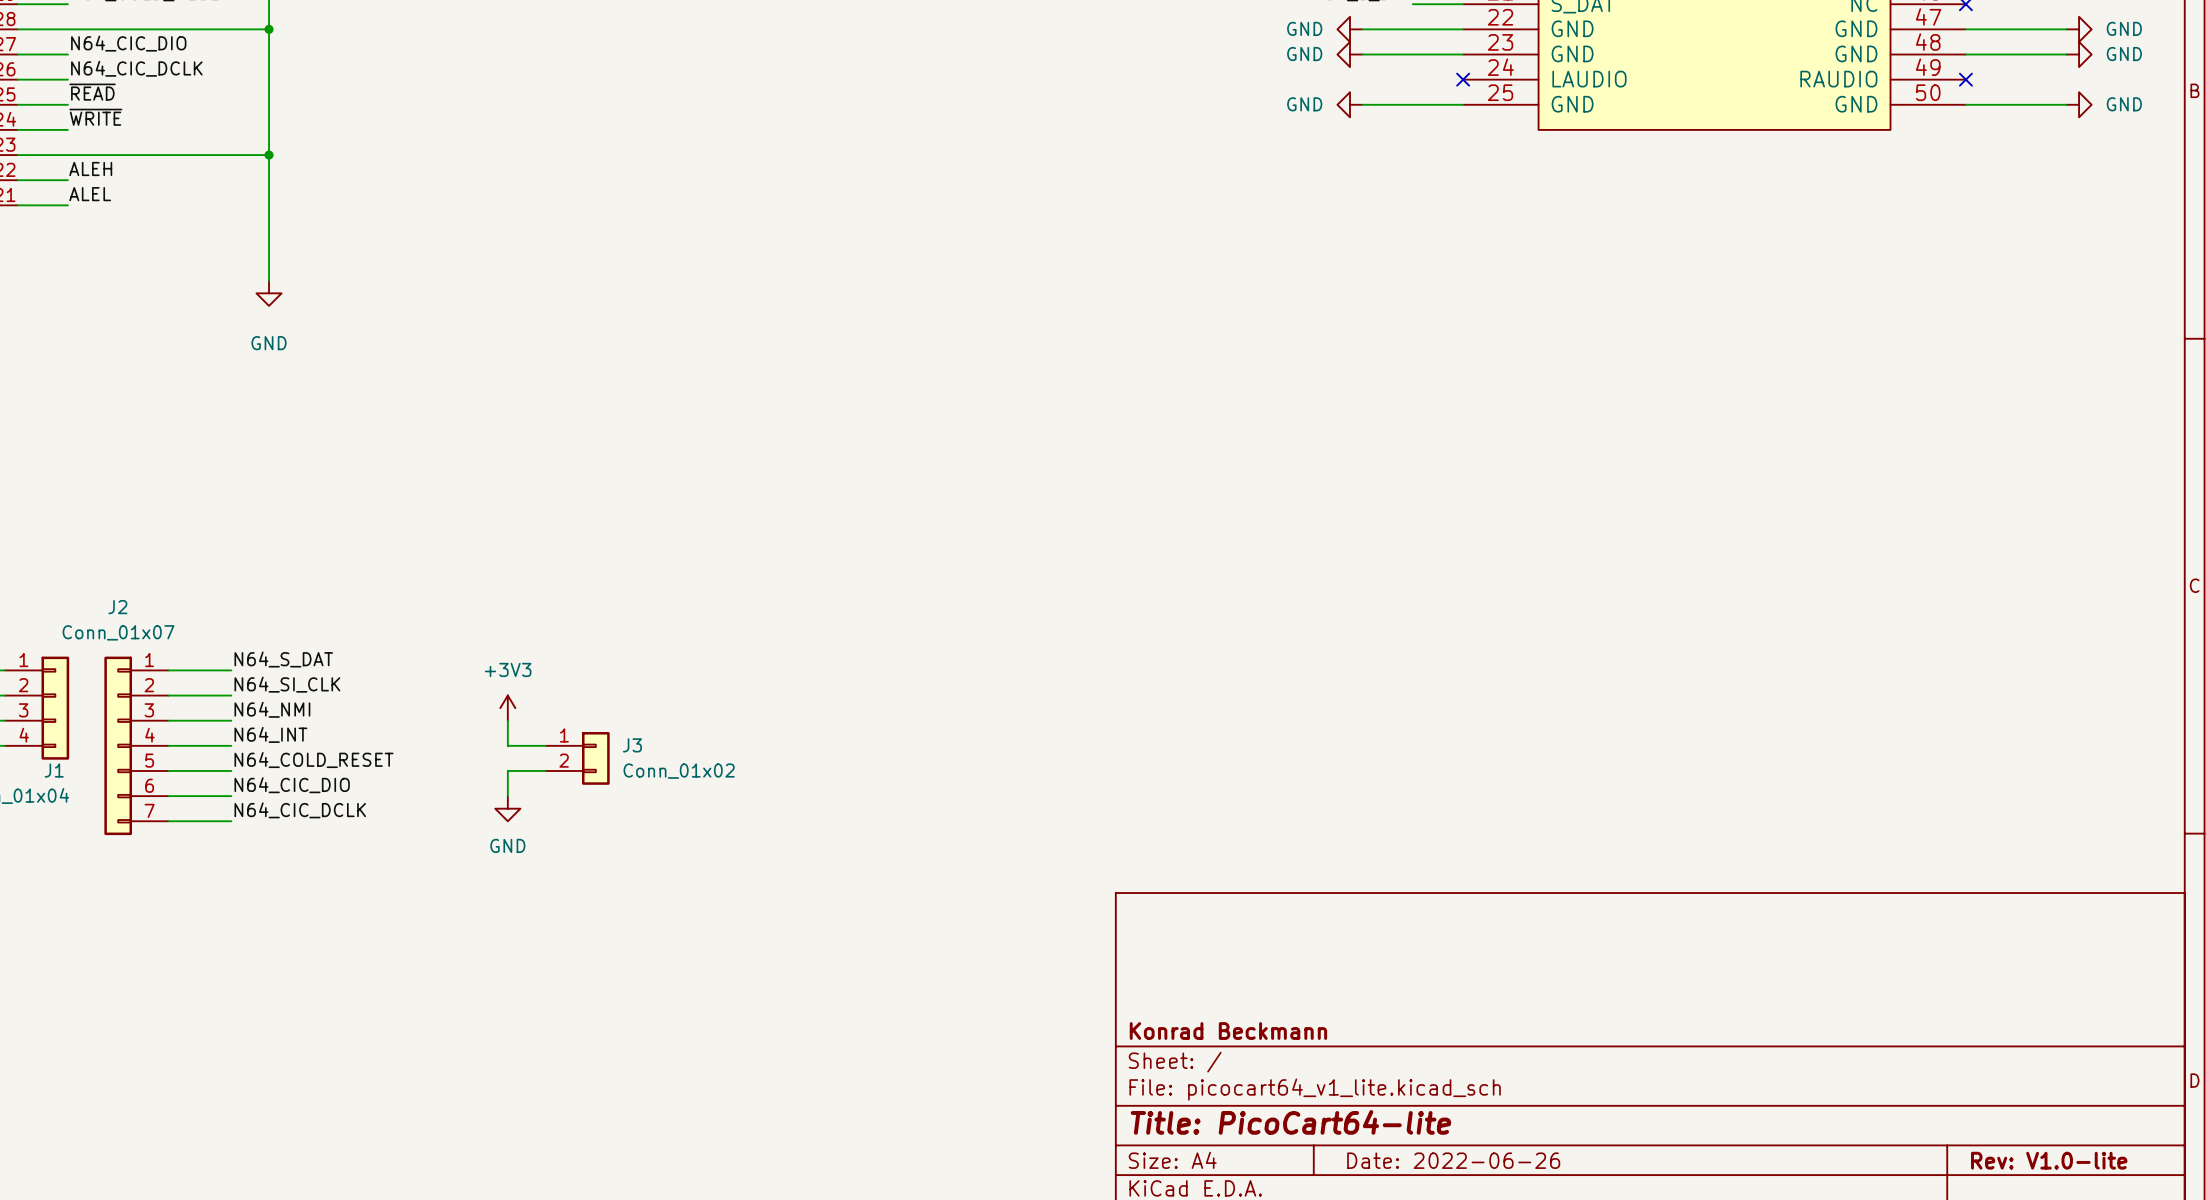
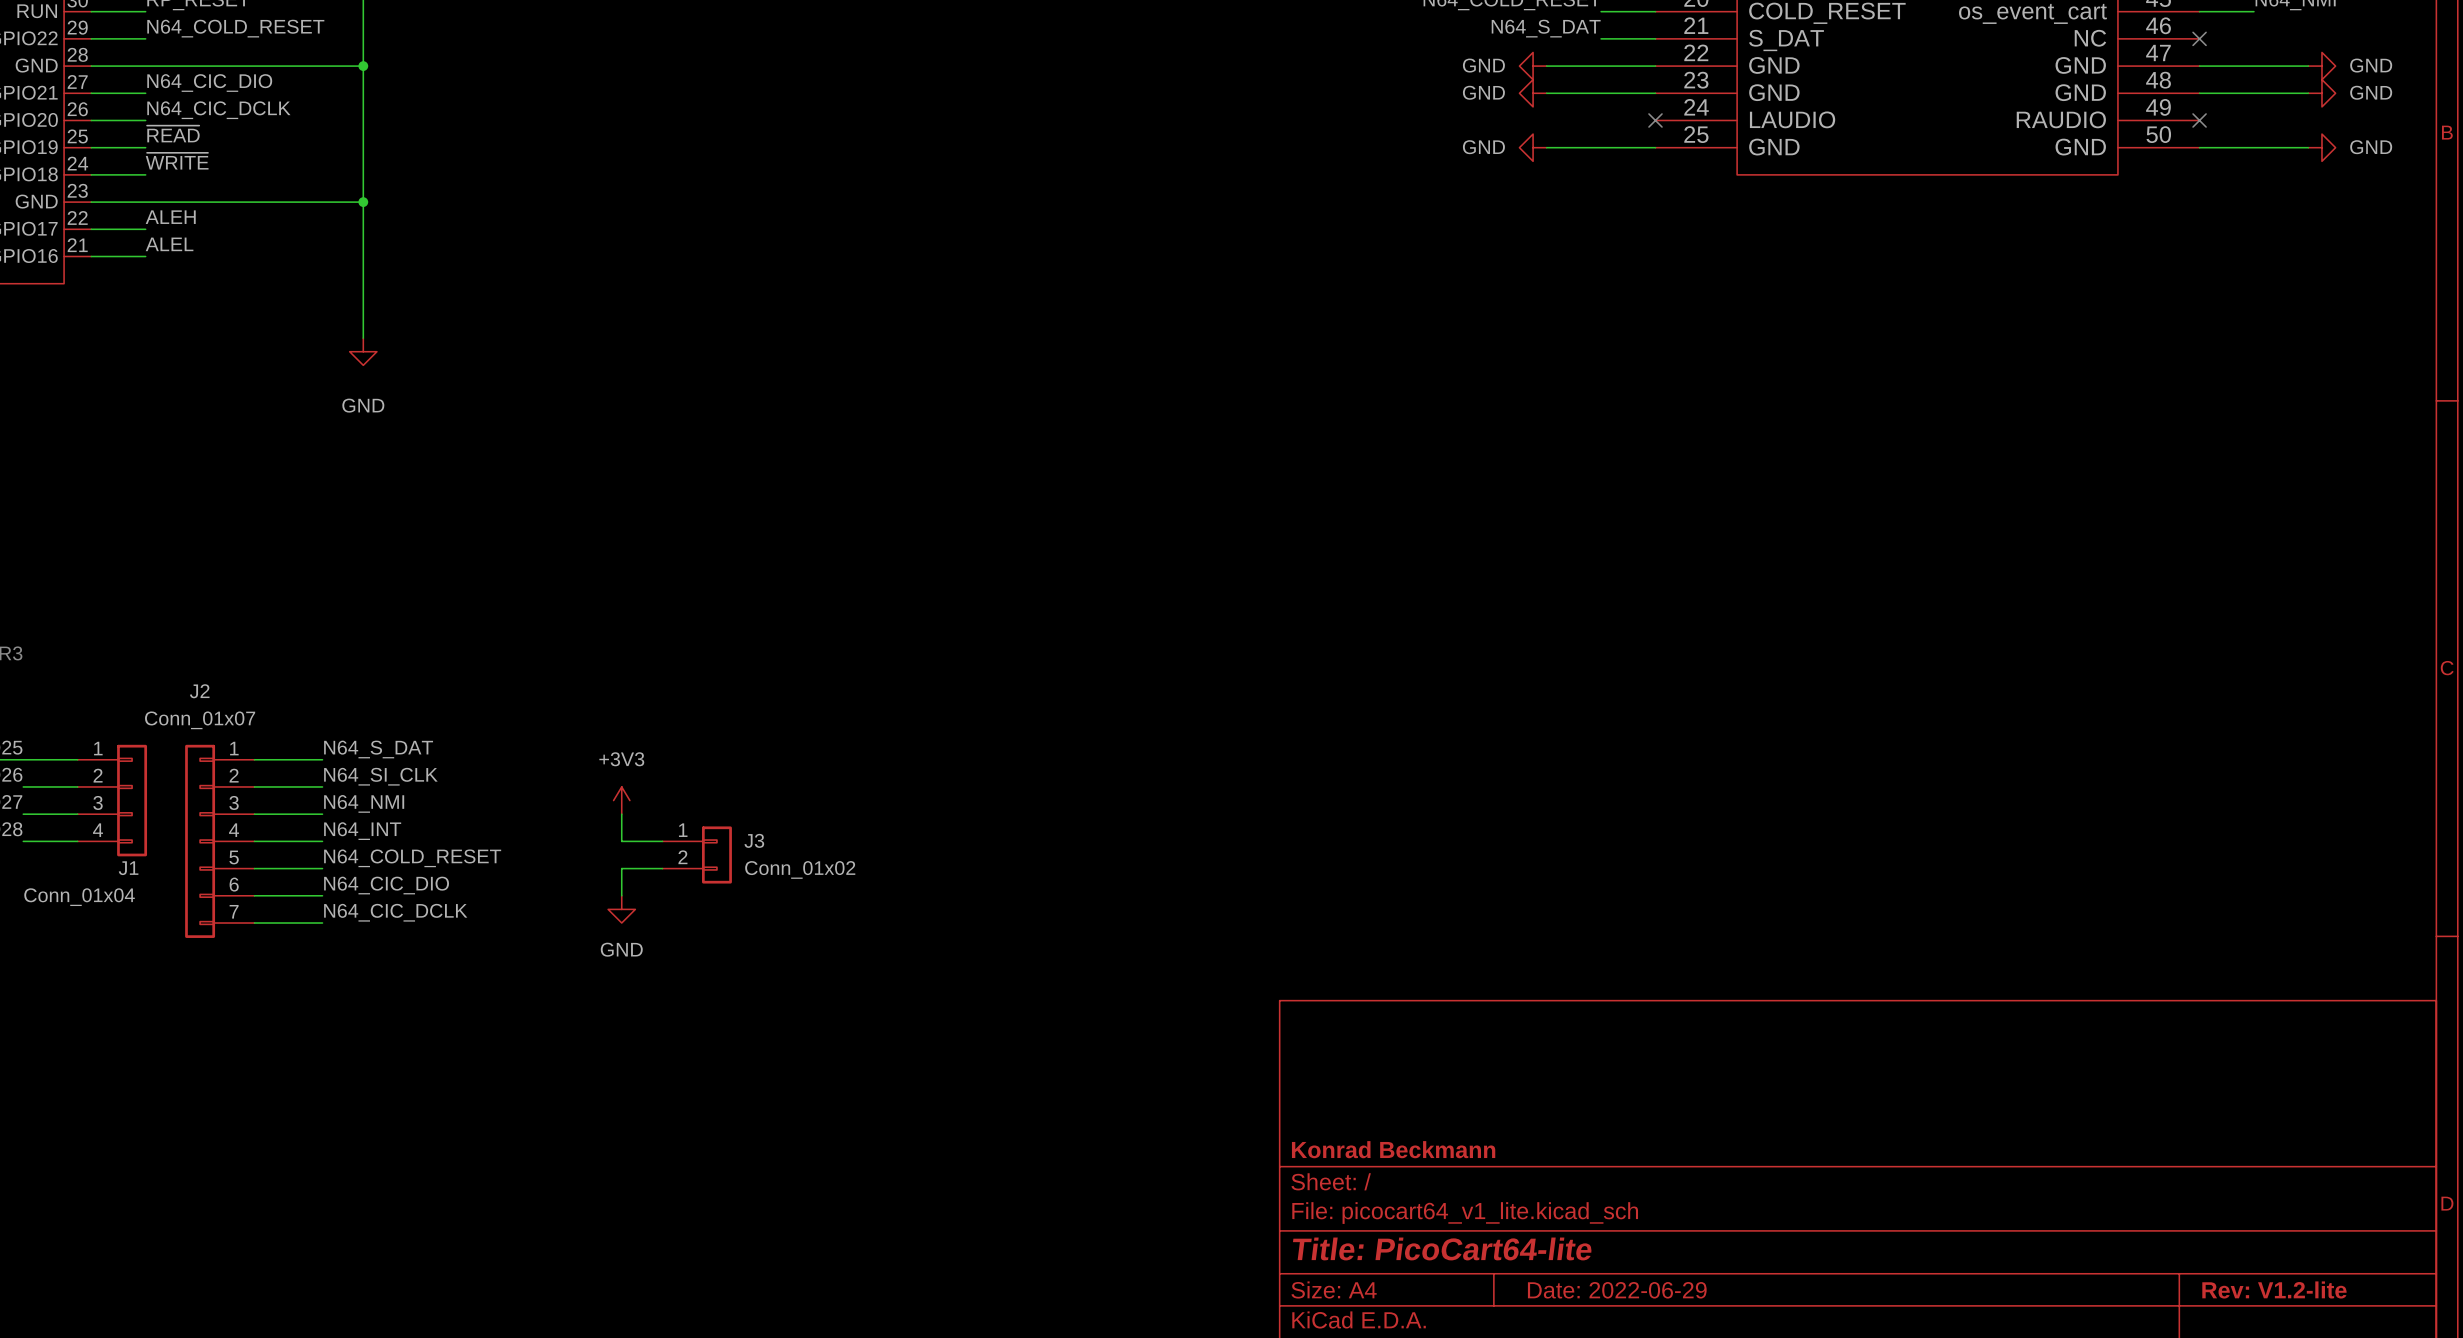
title block: Date: 2022-06-26 (1453, 1160) -> Date: 2022-06-29 (1617, 1290)
title block: Rev: V1.0-lite (2049, 1160) -> Rev: V1.2-lite (2274, 1289)

